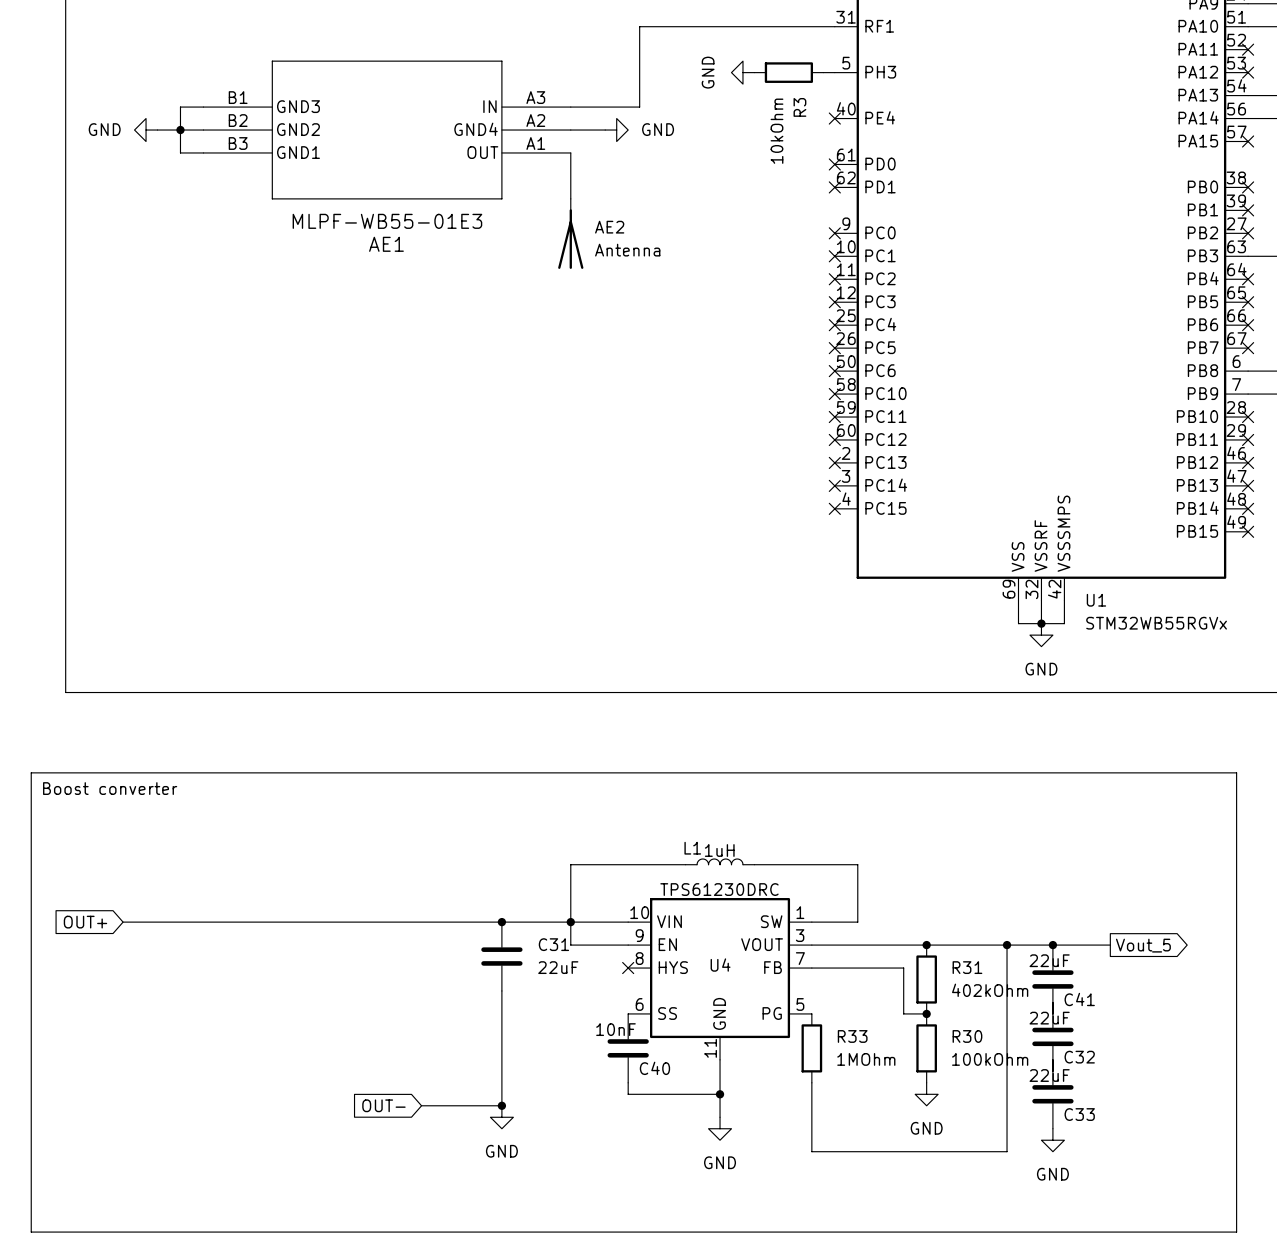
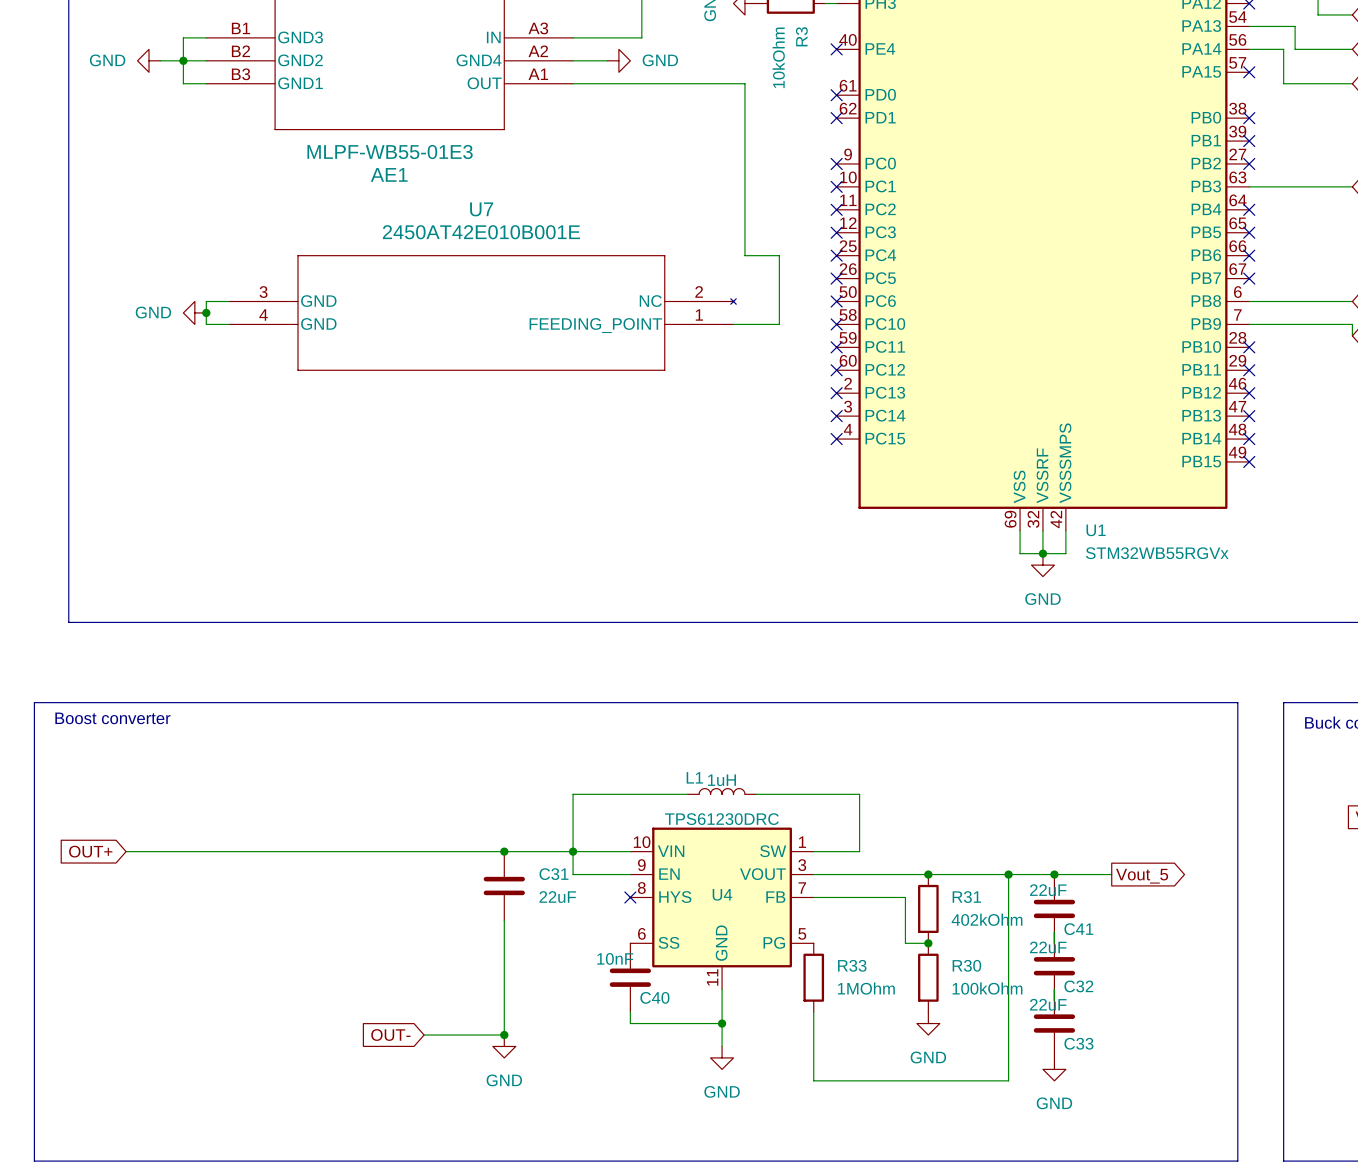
wire: (570, 152) (570, 198) -> (573, 83) (744, 83) (744, 255) (779, 255) (779, 324) (733, 324)
AE2: Antenna (570, 233) -> none
wire: none -> (229, 301) (206, 301) (206, 324) (229, 324)
power symbol: none -> GND (194, 312)
junction: none -> (206, 312)
U7: none -> 2450AT42E010B001E (482, 312)

